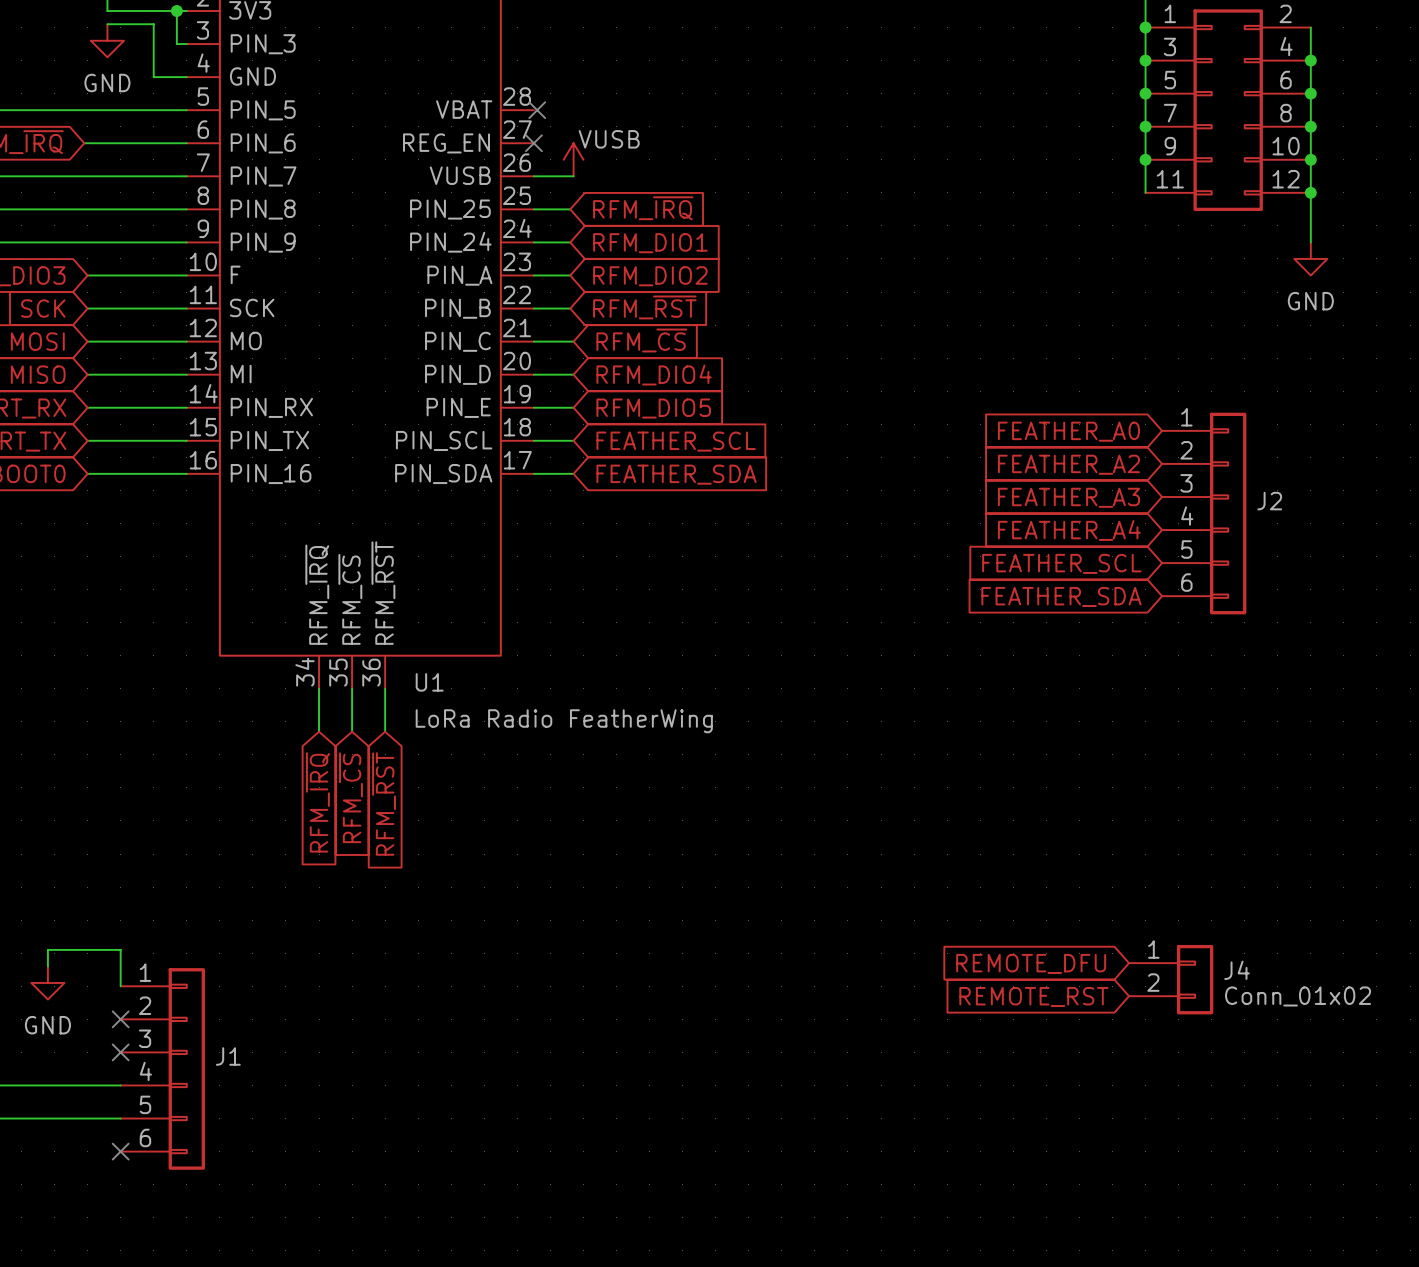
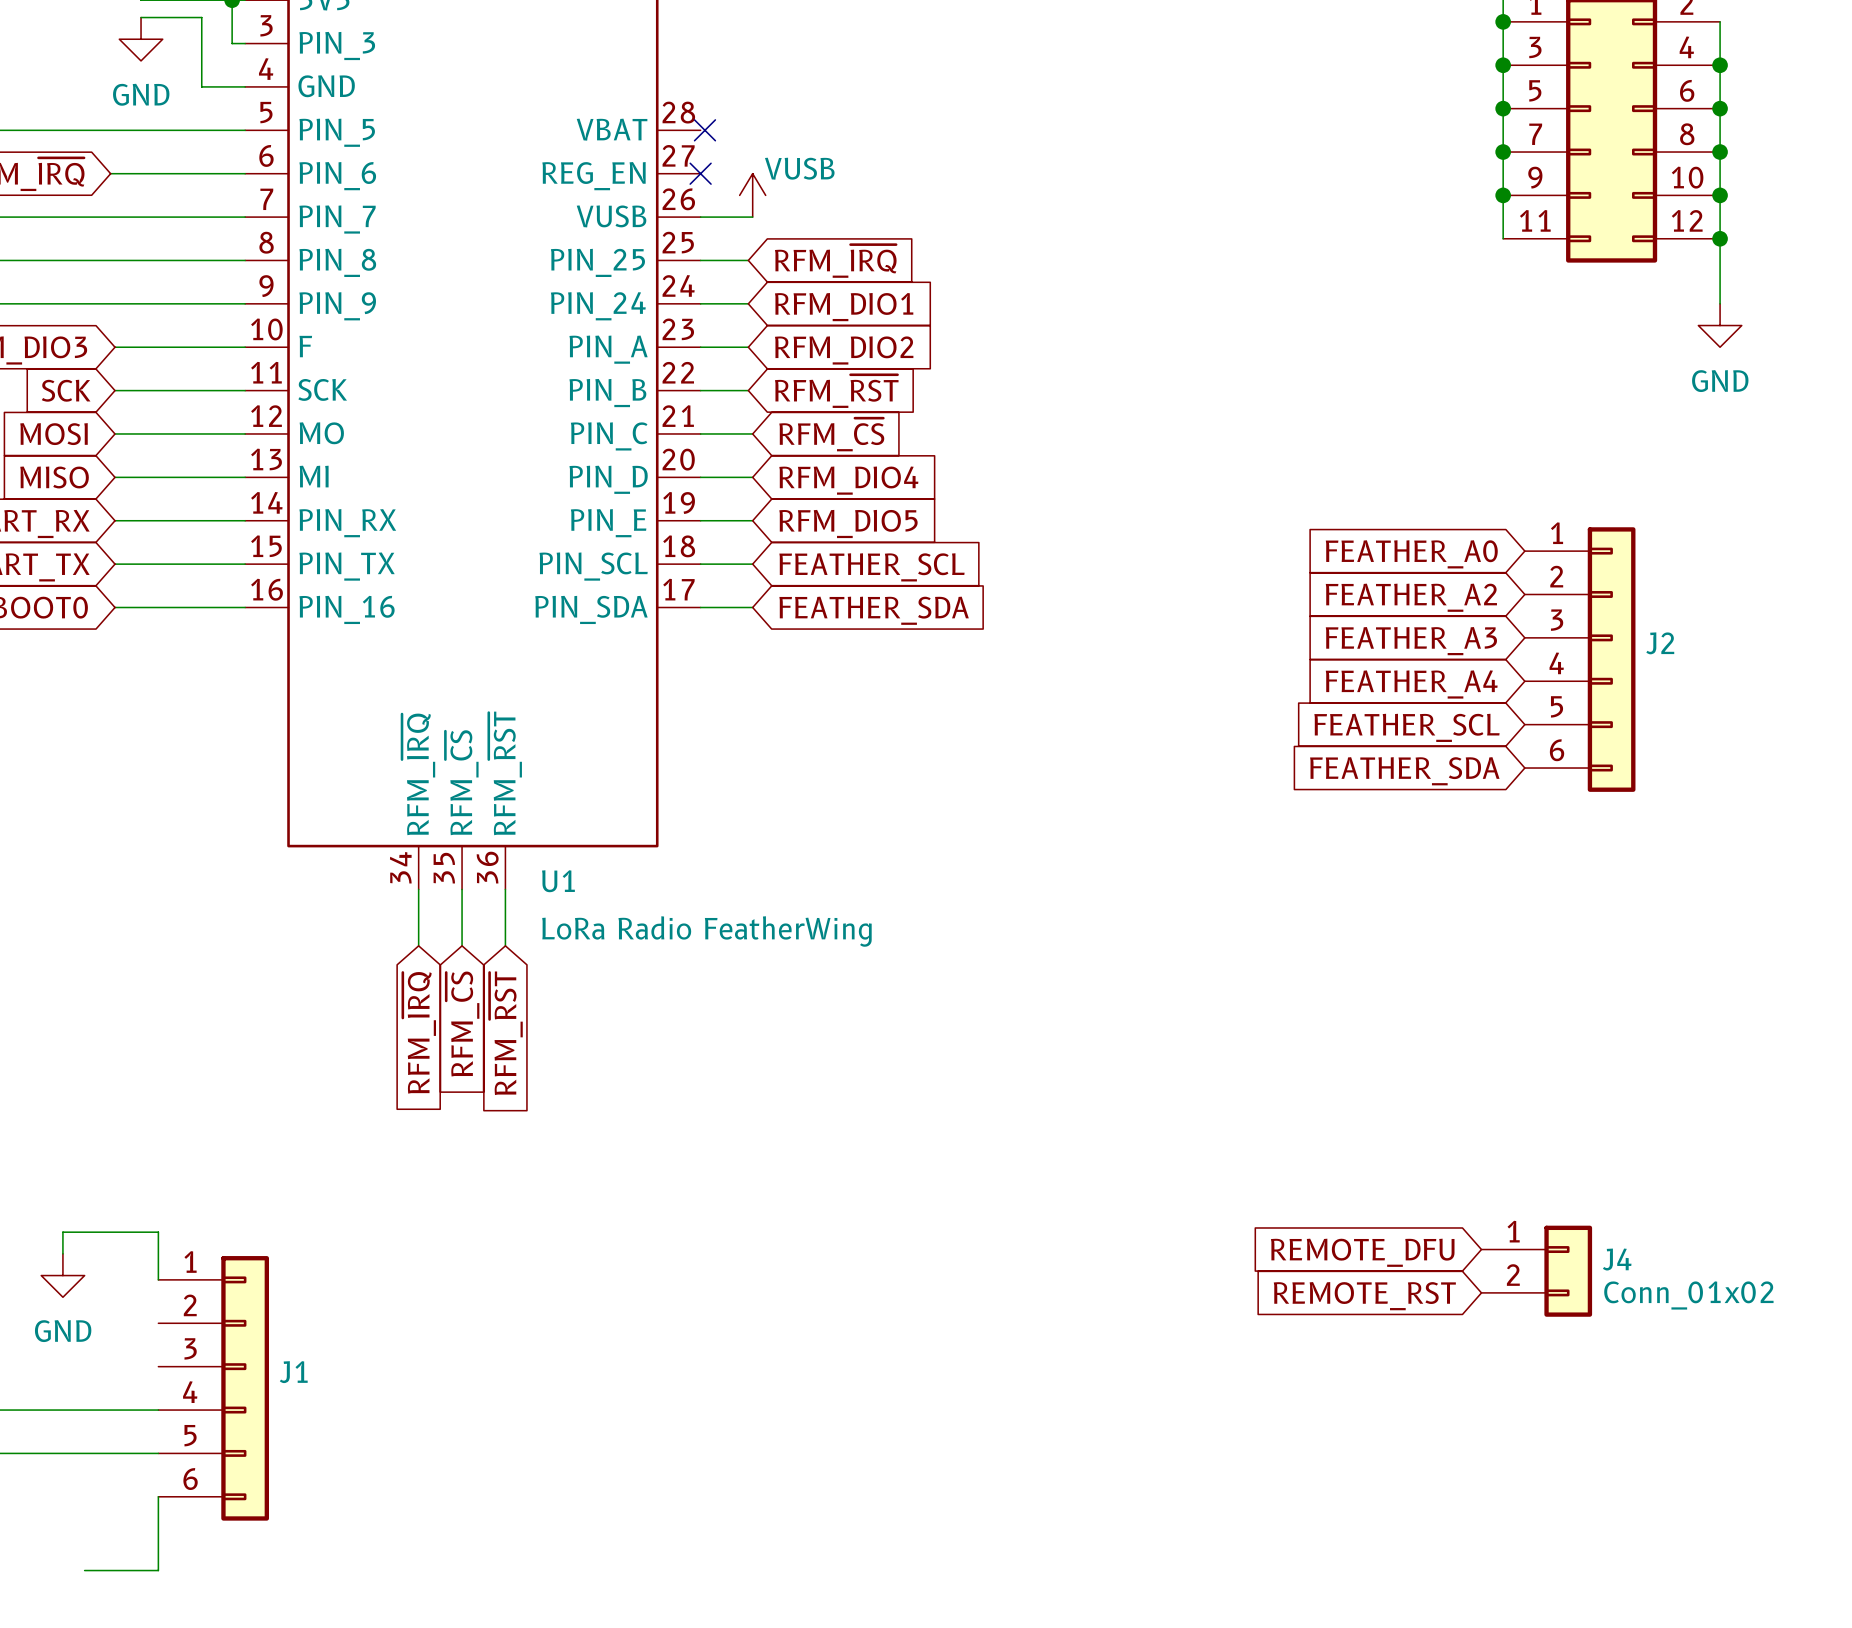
no-connect mark: (120, 1019) -> none
no-connect mark: (120, 1052) -> none
wire: none -> (158, 1496) (158, 1570) (84, 1570)
no-connect mark: (120, 1151) -> none

